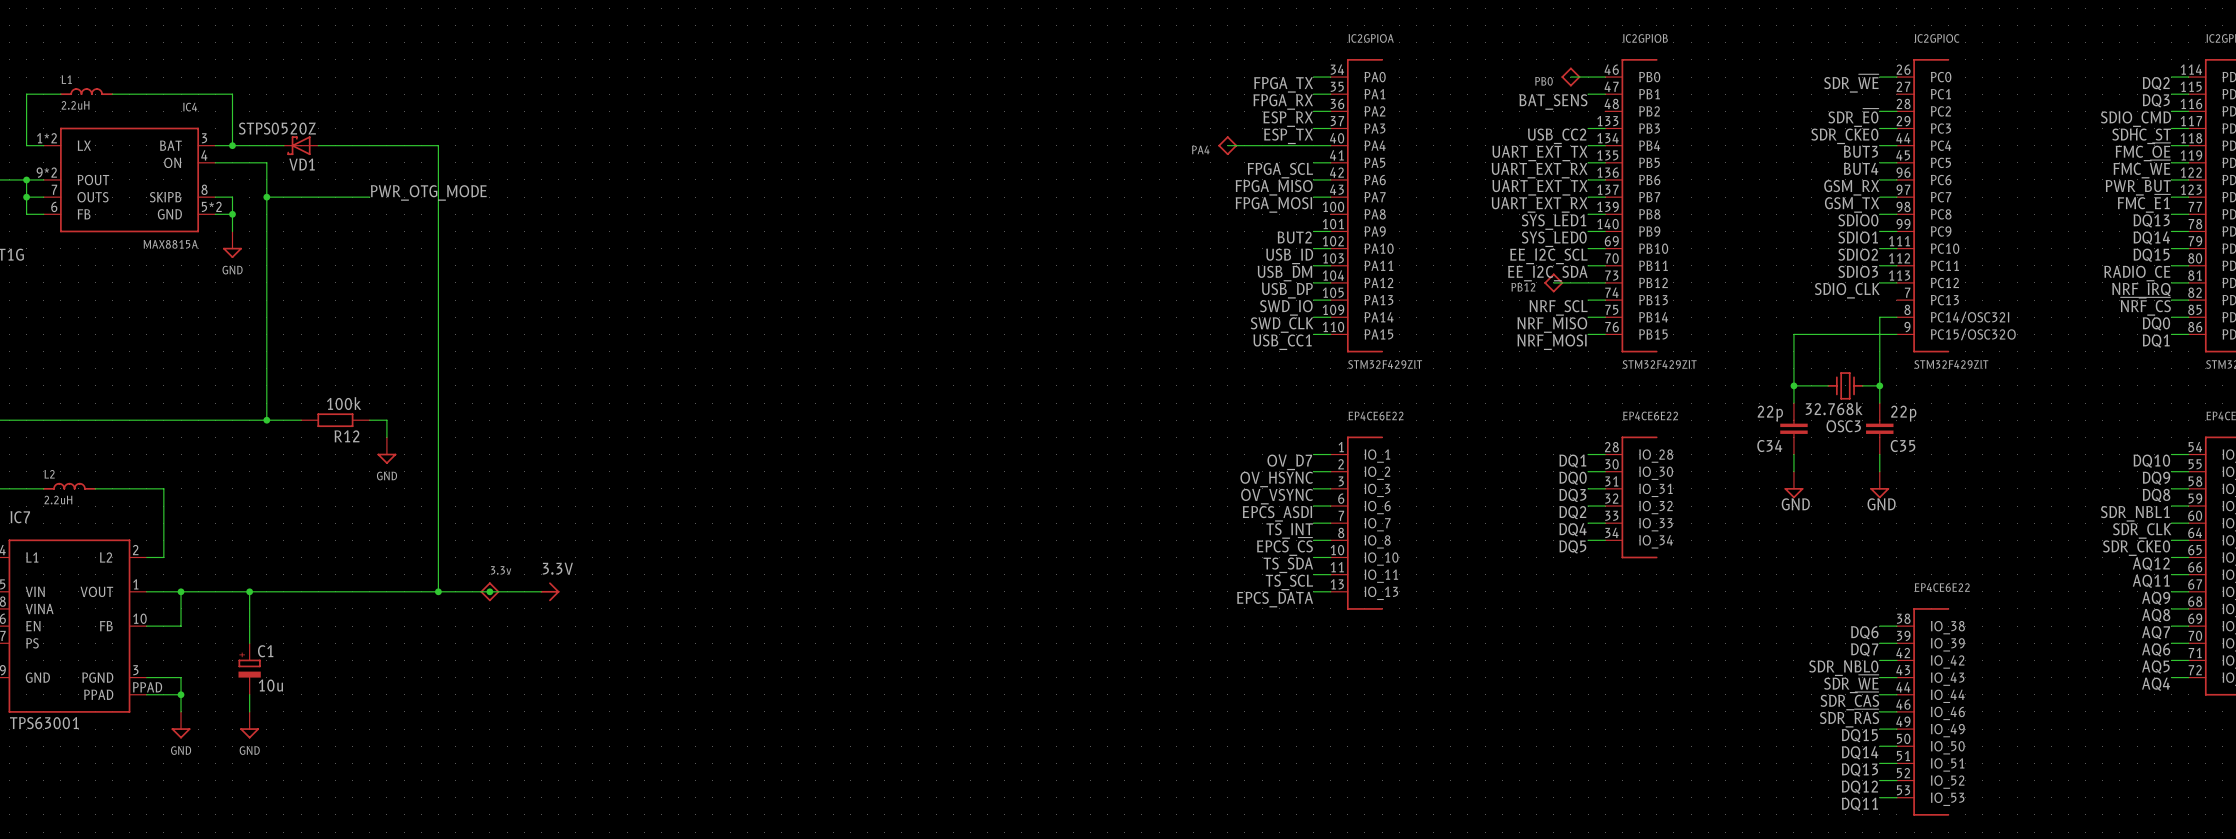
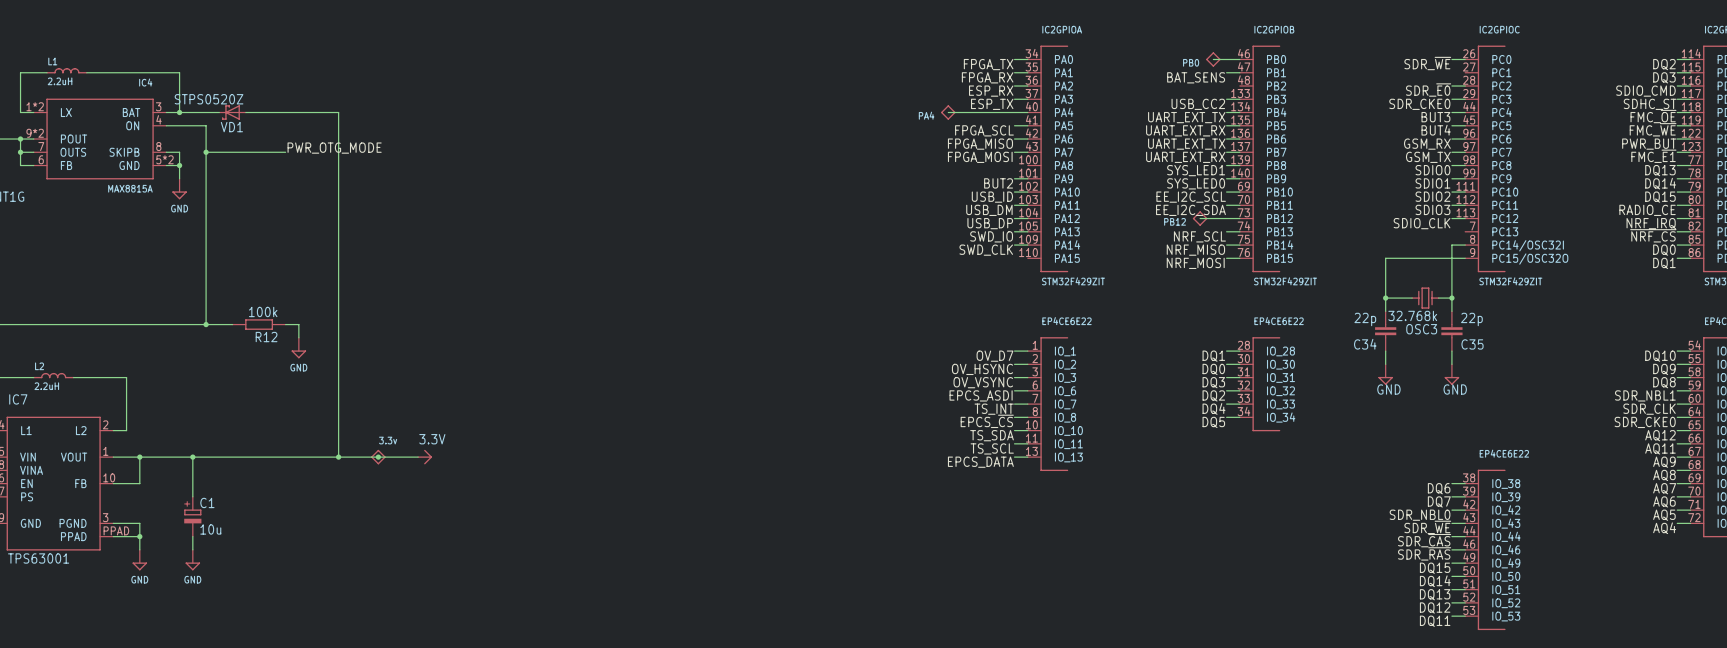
wire: (1313, 334) (1330, 334) -> none
label: USB_CC1 (1282, 342) -> none

